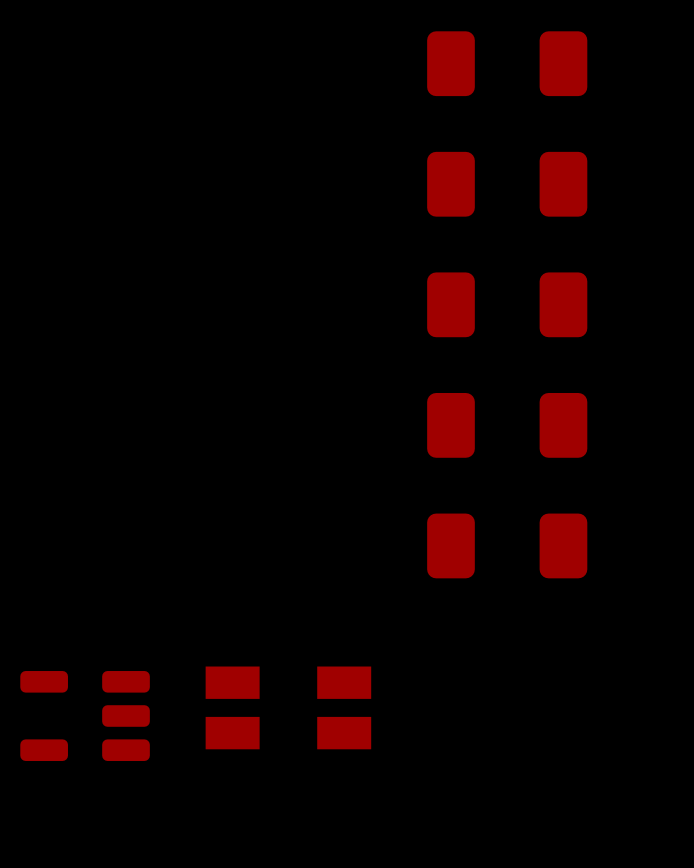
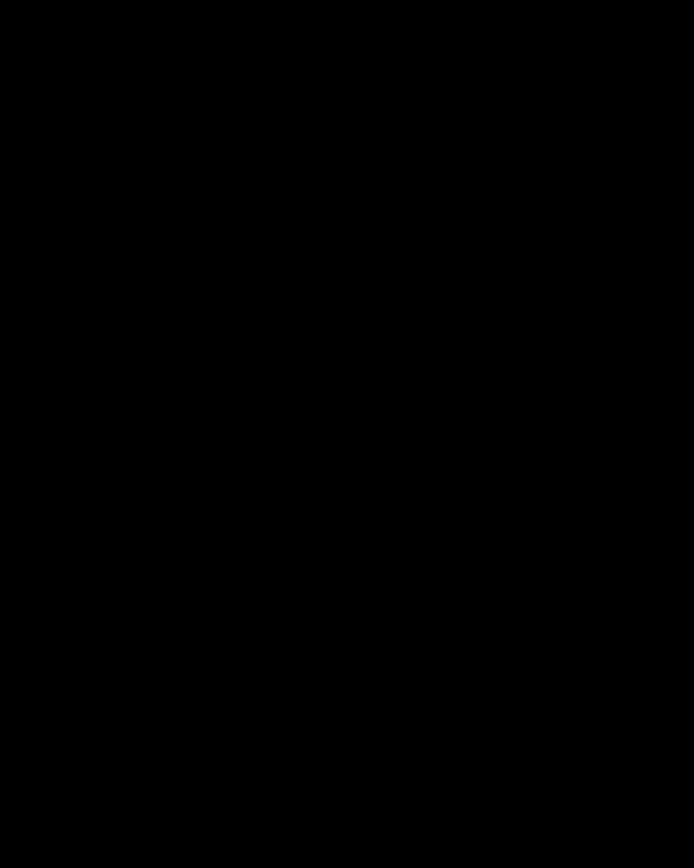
part: (507, 63) -> none
part: (507, 184) -> none
part: (507, 304) -> none
part: (507, 425) -> none
part: (507, 545) -> none
part: (288, 707) -> none
part: (85, 716) -> none

